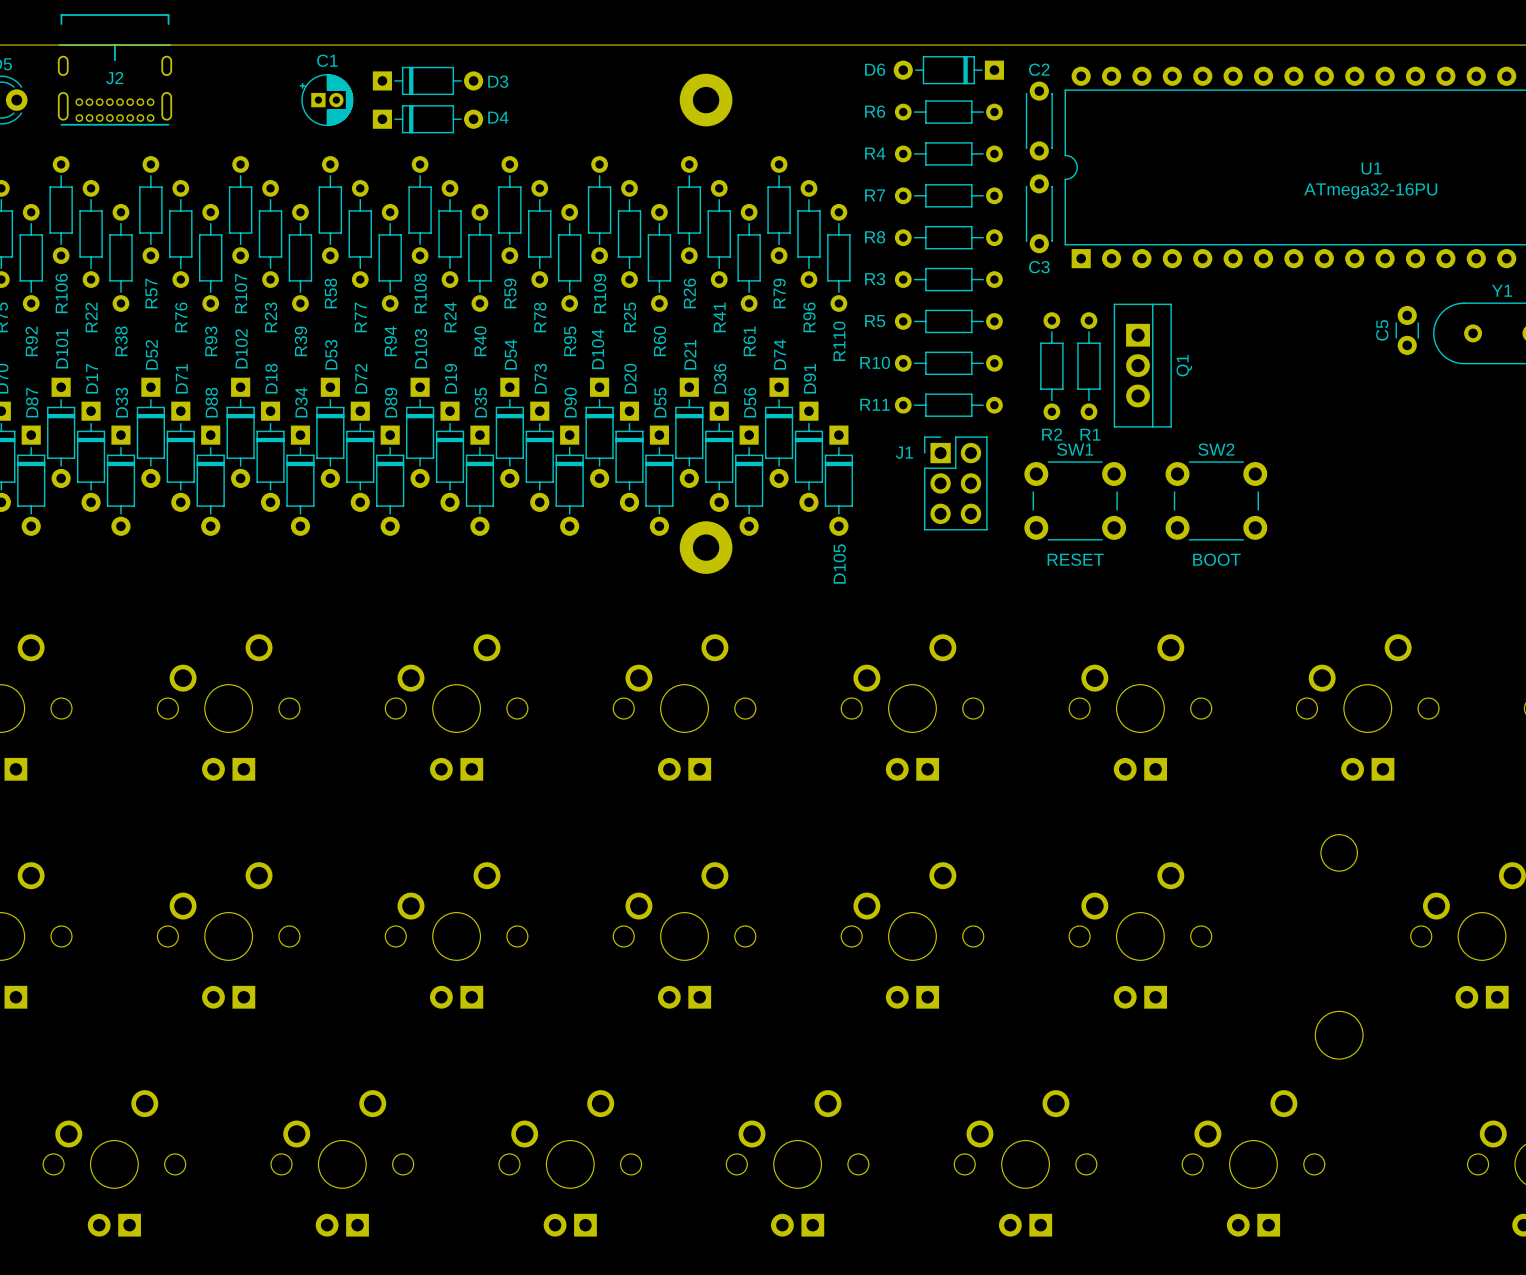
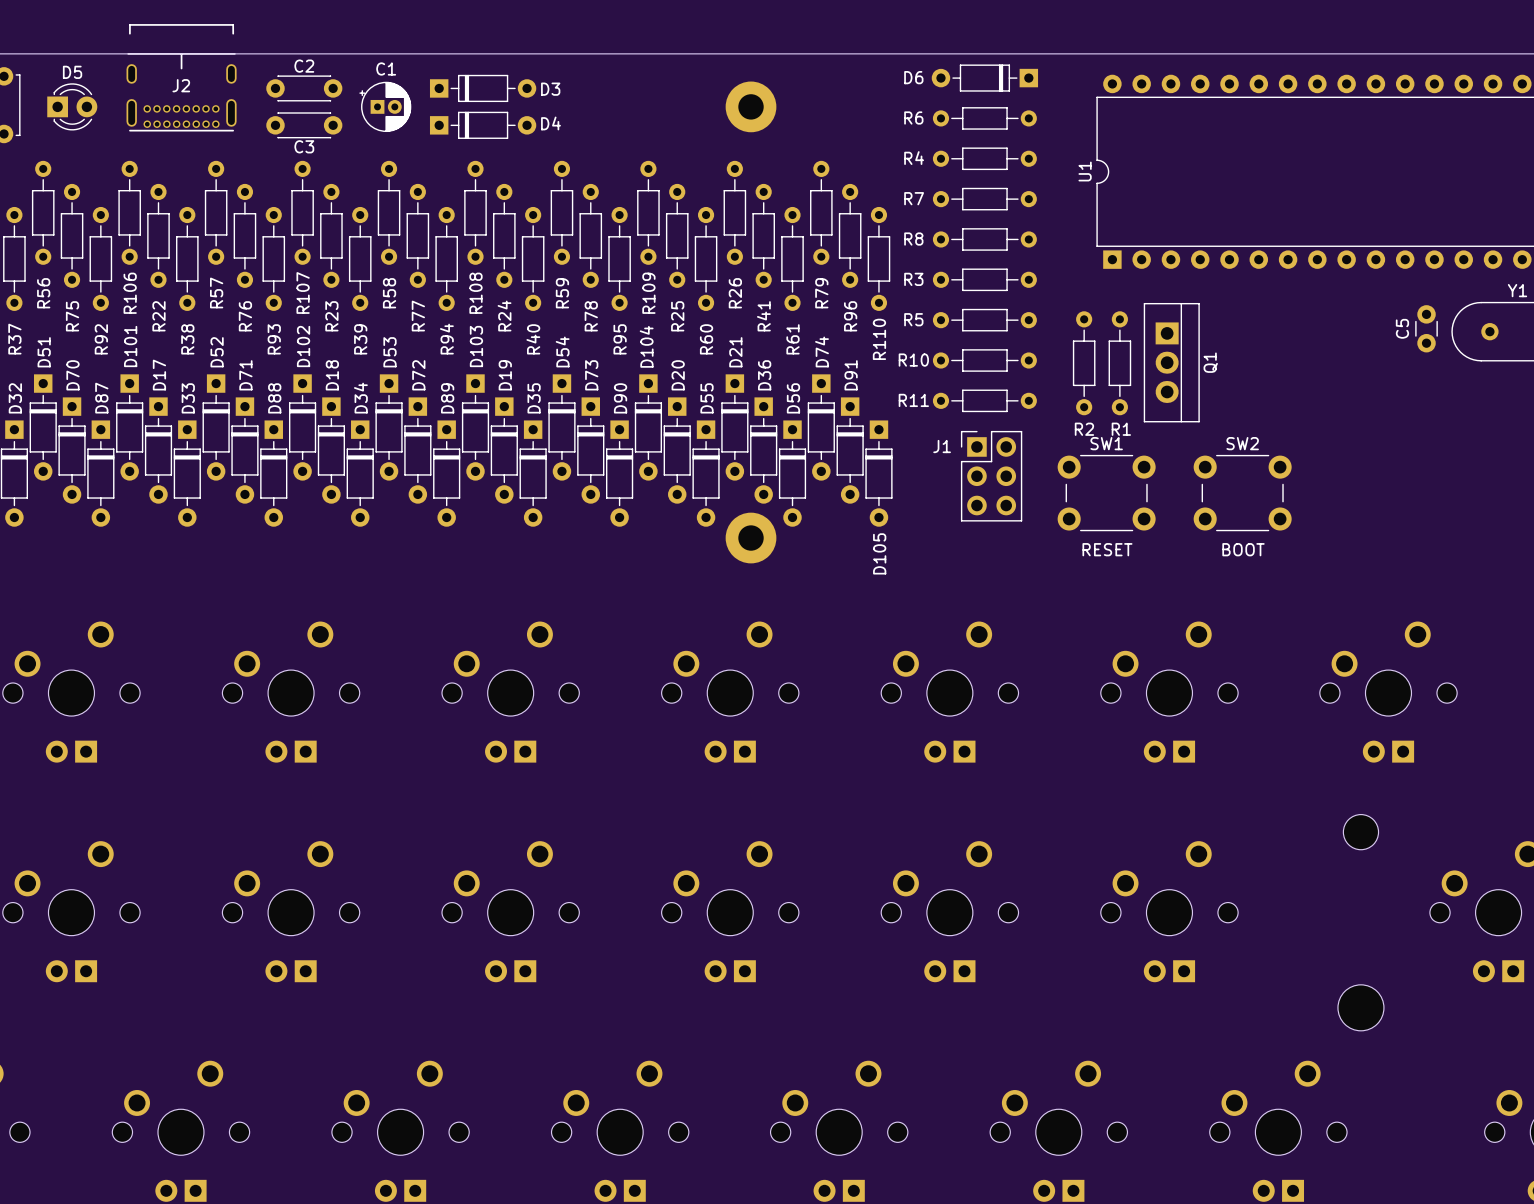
C2 name position: C2 (1039, 69) -> C2 (304, 66)
C2 rotation: 0° (1039, 121) -> 90° clockwise (304, 88)
C2 position: (1039, 121) -> (304, 88)
U1 name rotation: 0° (1371, 168) -> 90° counterclockwise (1085, 171)
U1 name position: U1 (1371, 168) -> U1 (1085, 171)
U1 value: ATmega32-16PU (1370, 191) -> none
C3 rotation: 0° (1039, 213) -> 90° clockwise (304, 125)
C3 position: (1039, 213) -> (304, 125)
C3 name position: C3 (1039, 267) -> C3 (304, 146)

